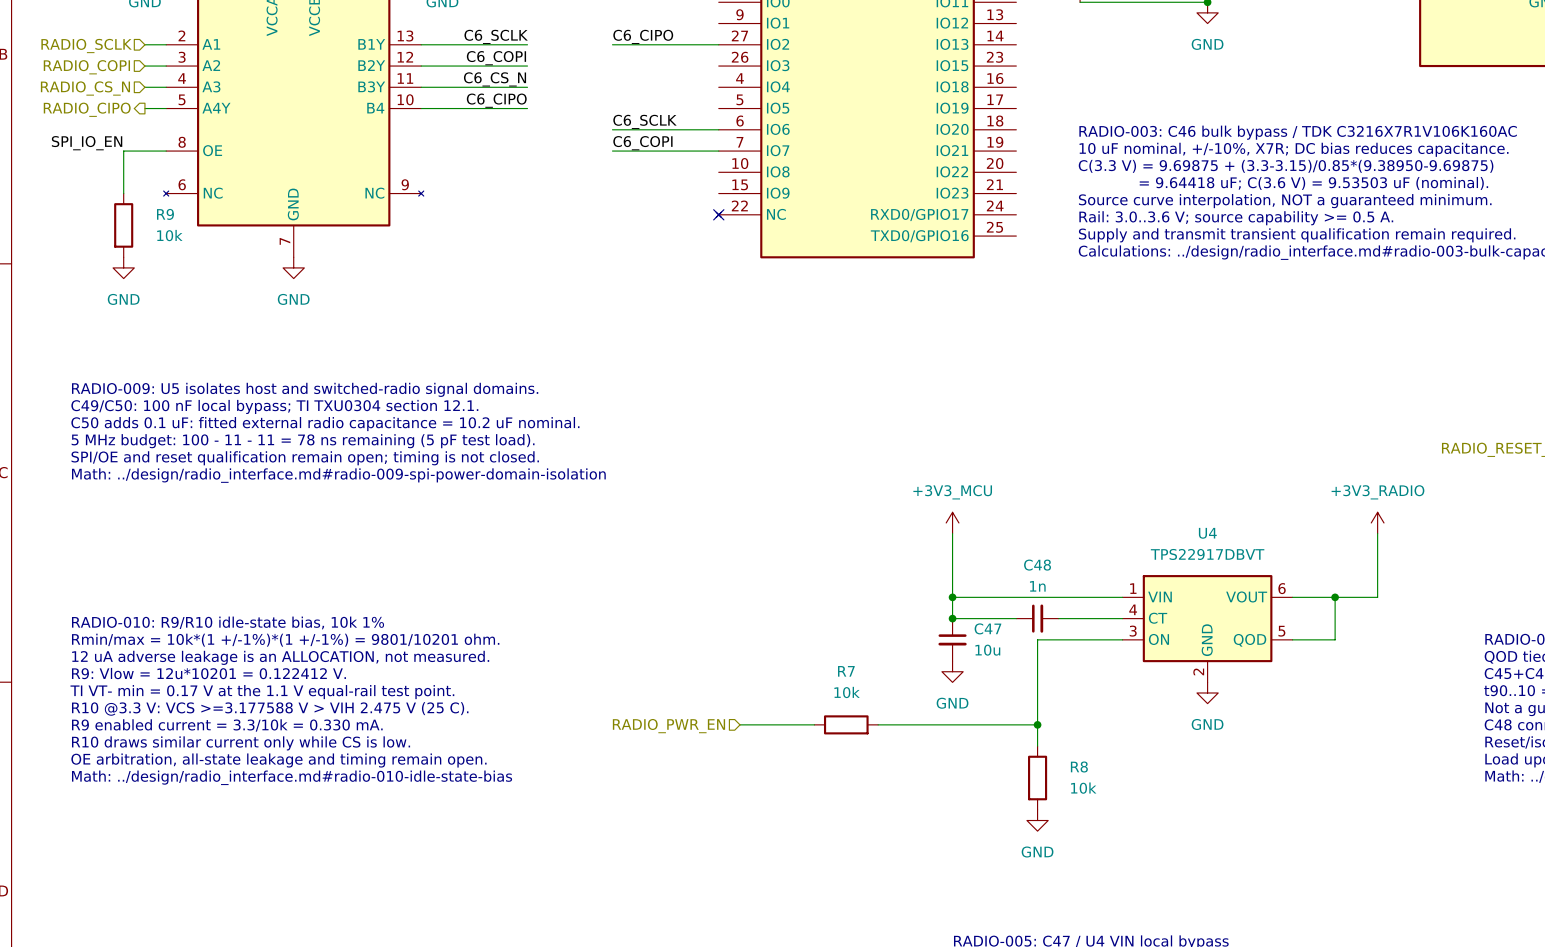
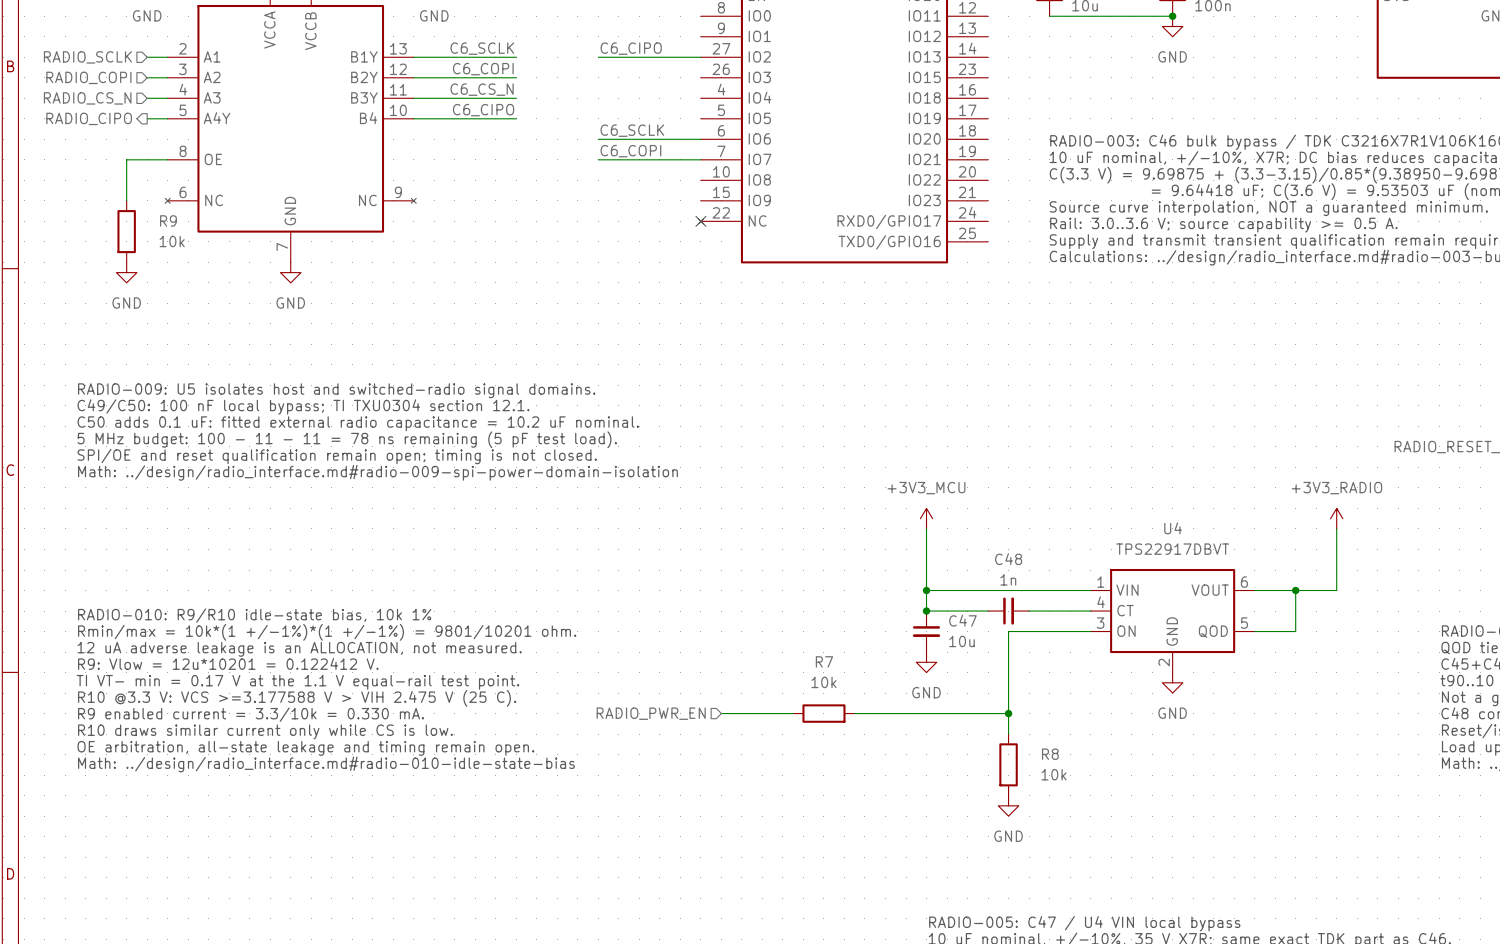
label: SPI_IO_EN (87, 143) -> none

